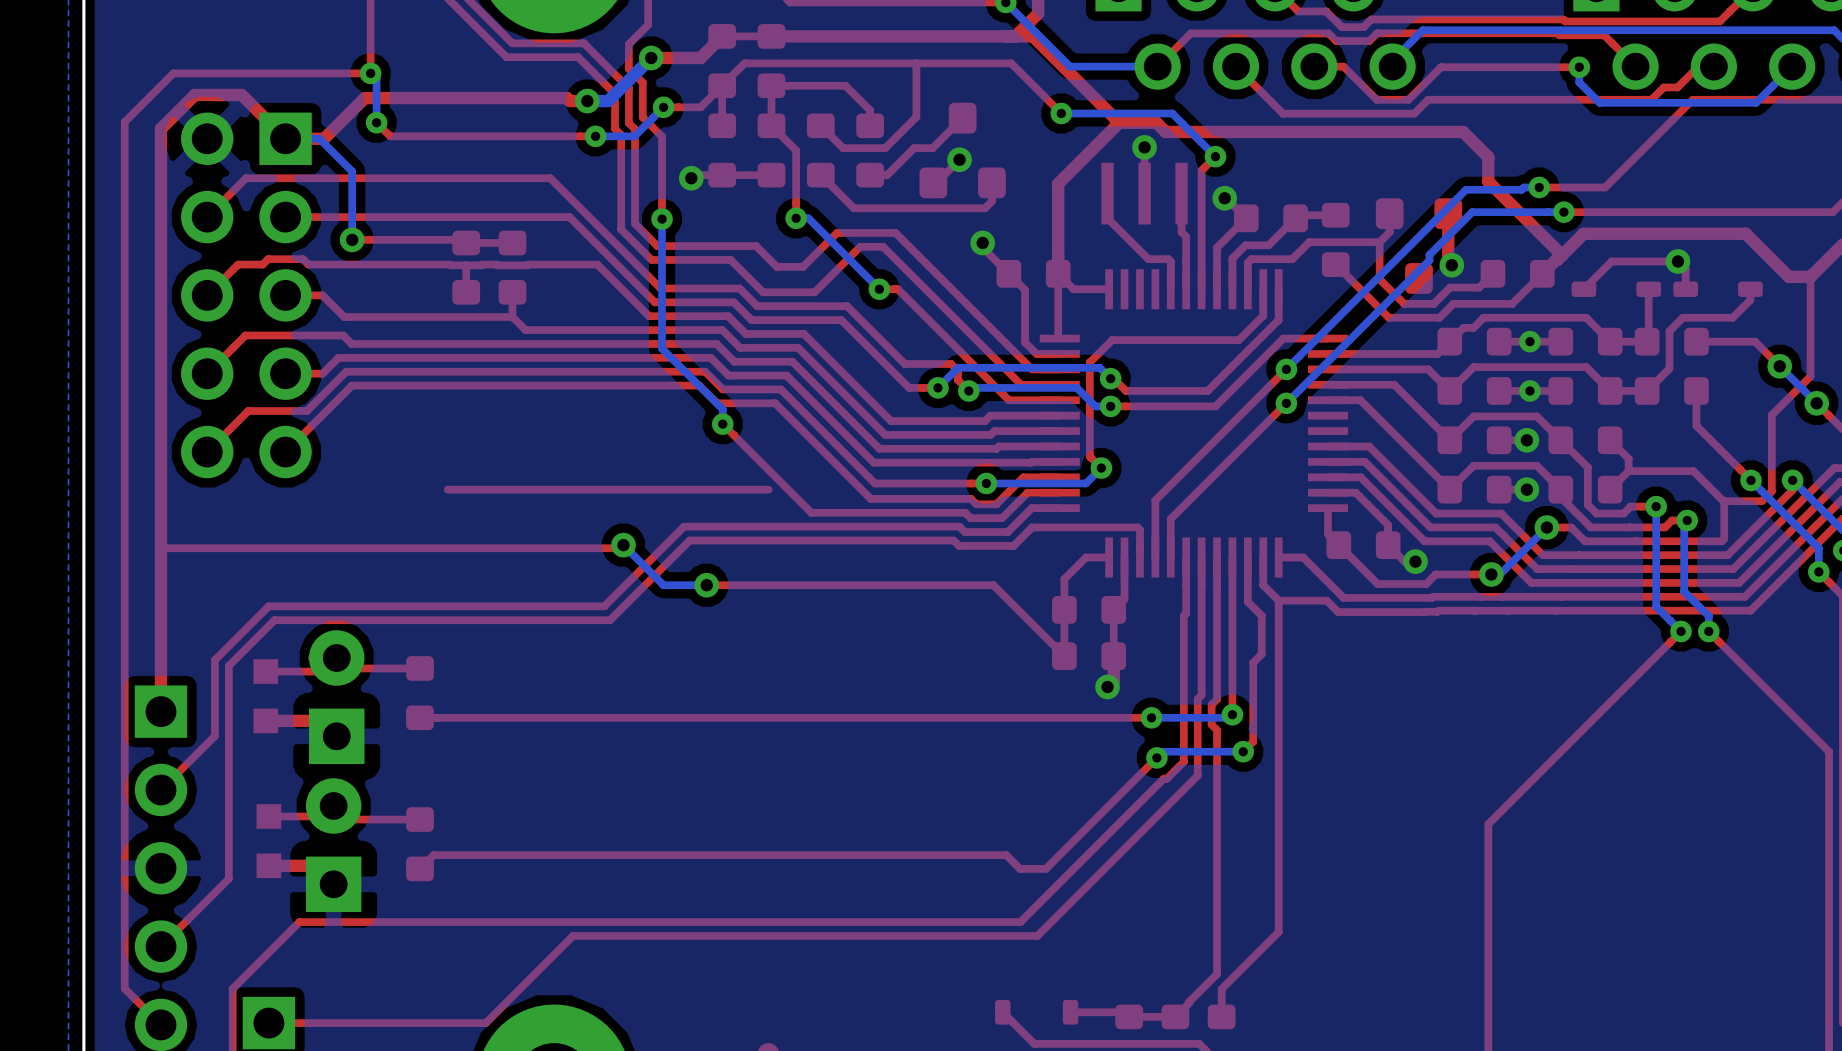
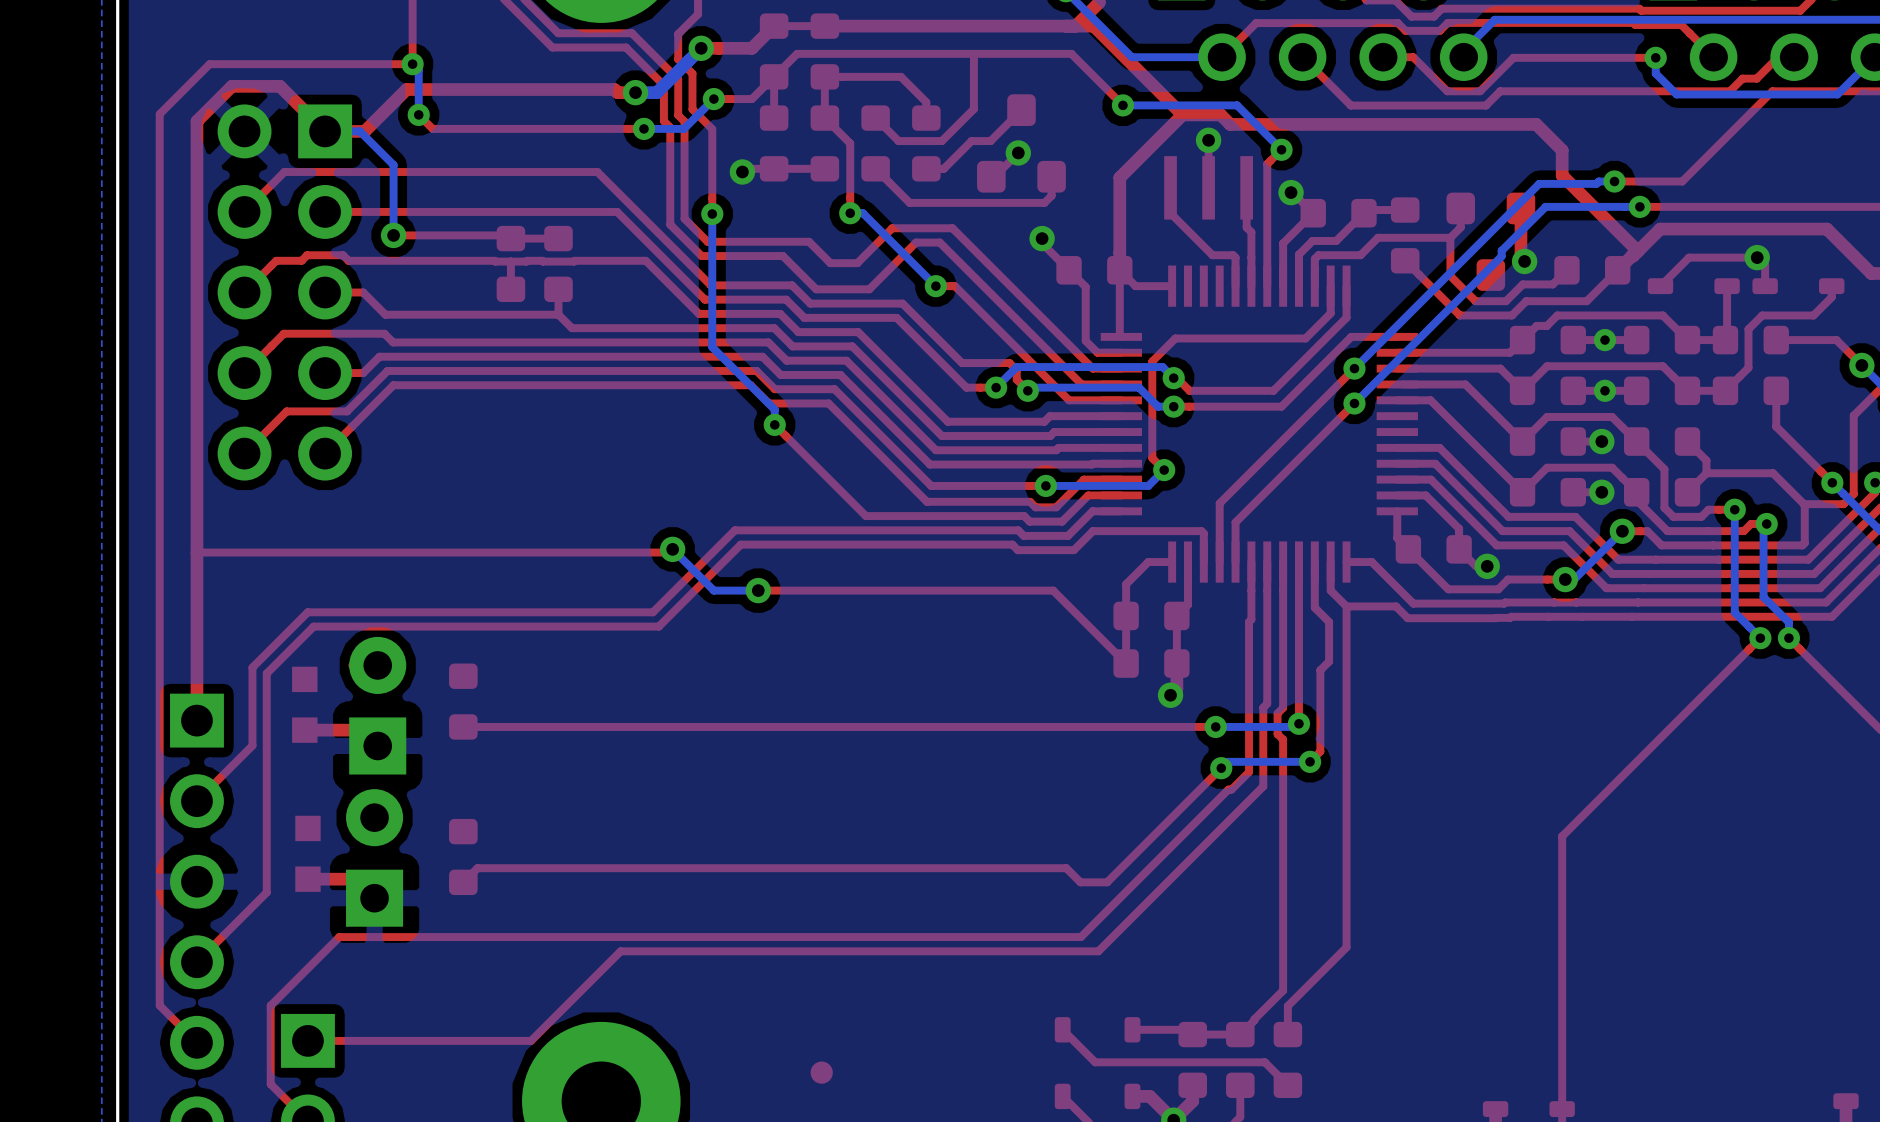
top track: (768, 489) (447, 489) -> none
top track: (419, 668) (347, 668) (336, 657) (323, 671) (265, 671) -> none
top track: (268, 816) (323, 816) (333, 805) (347, 819) (419, 819) -> none

